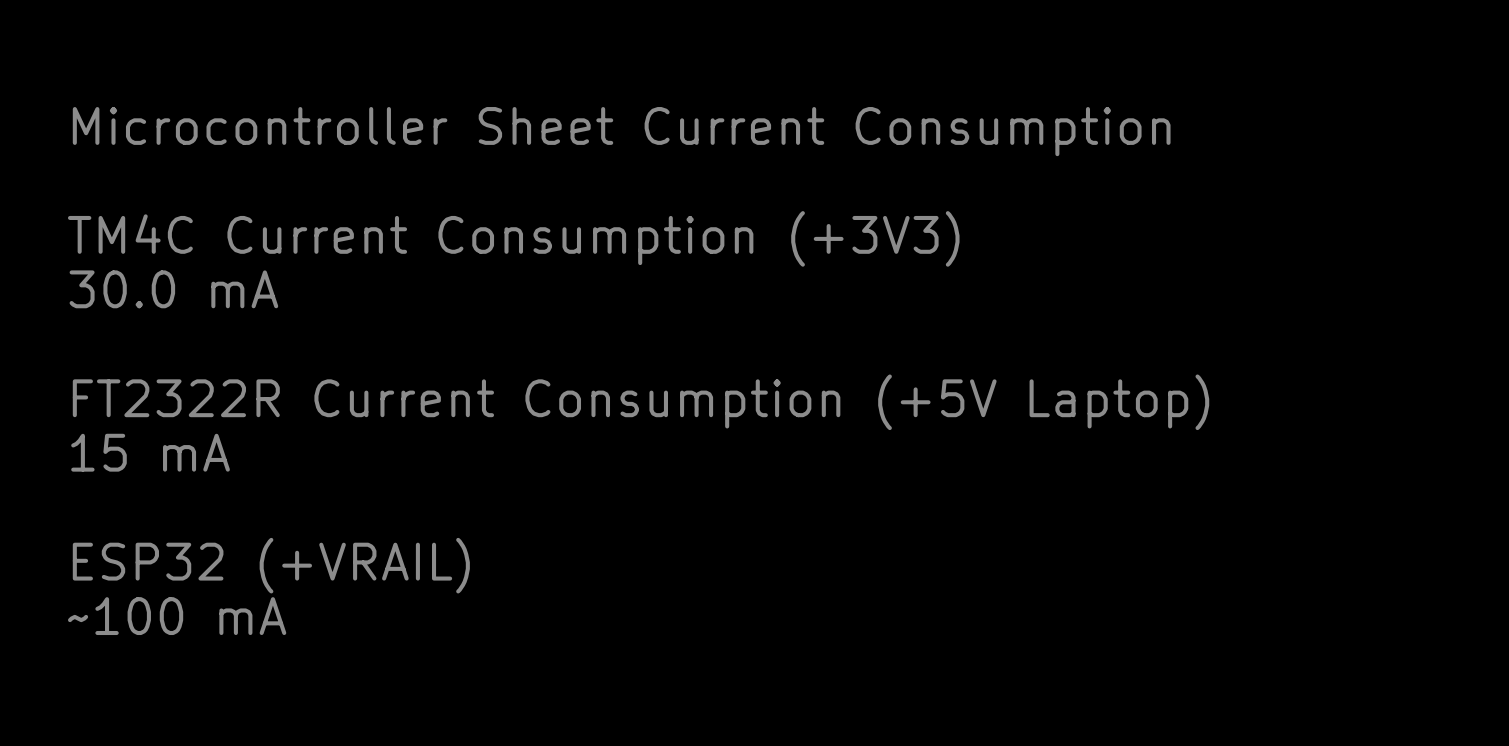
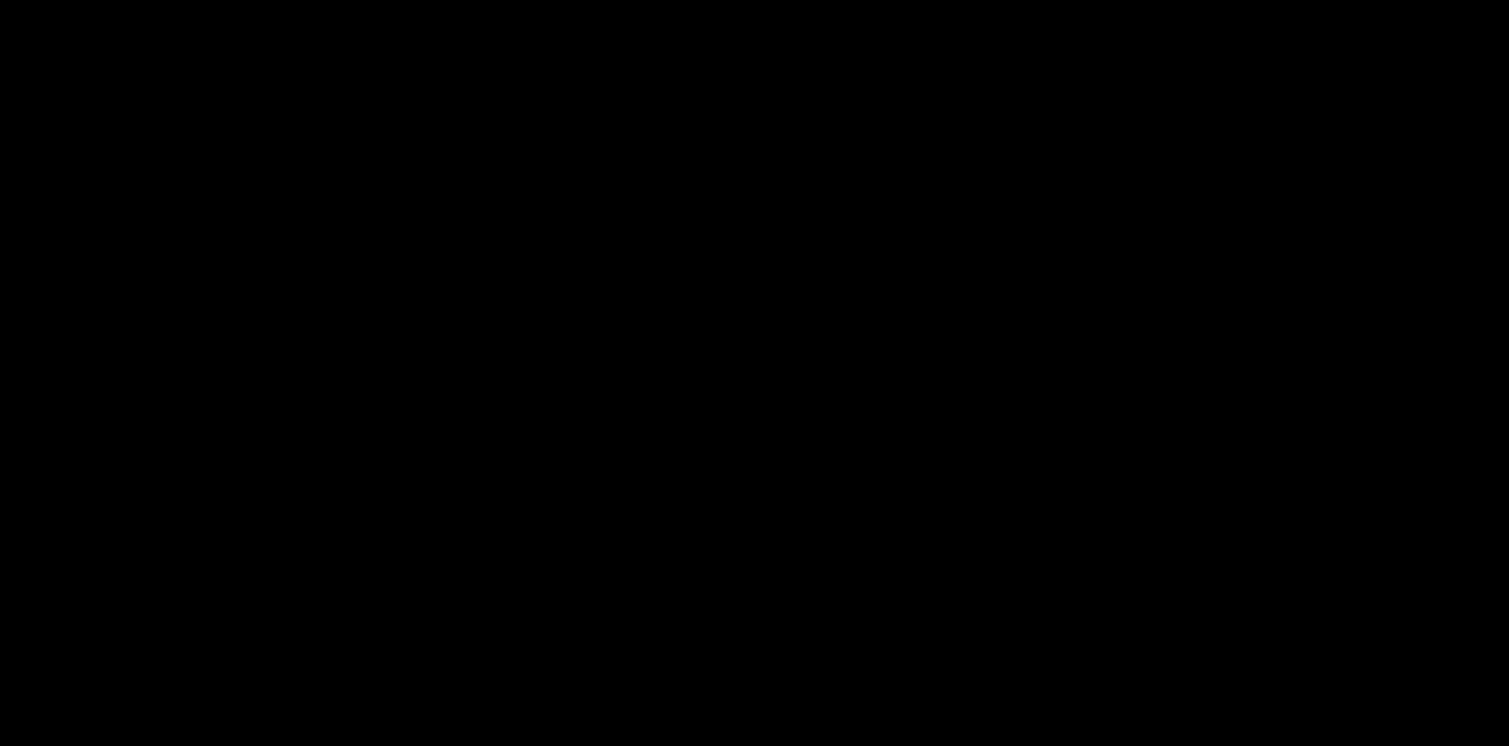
text: Microcontroller Sheet Current Consumption (621, 131) -> none
text: TM4C Current Consumption (+3V3) (513, 238) -> none
text: 30.0 mA (173, 289) -> none
text: FT2322R Current Consumption (+5V Laptop) (641, 402) -> none
text: 15 mA (150, 452) -> none
text: ESP32 (+VRAIL) (271, 565) -> none
text: ~100 mA (177, 616) -> none

